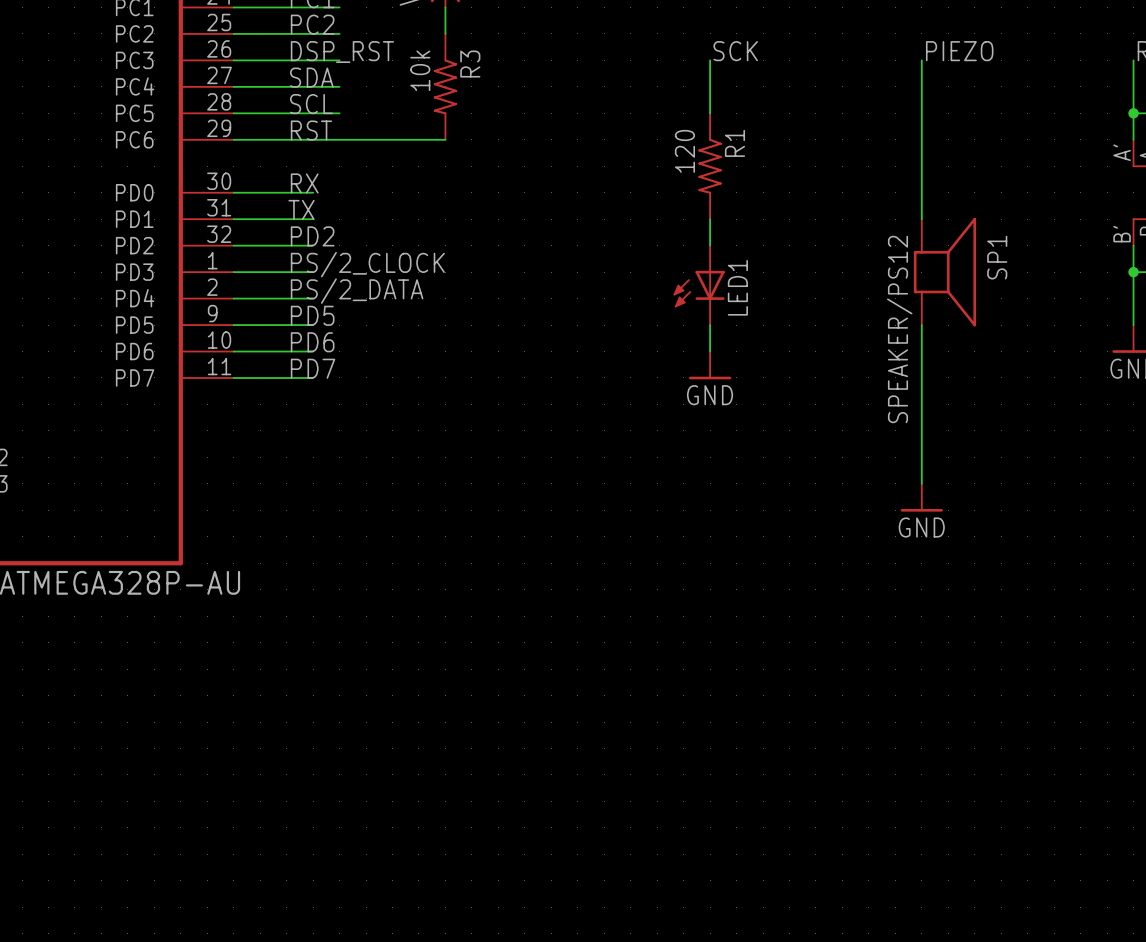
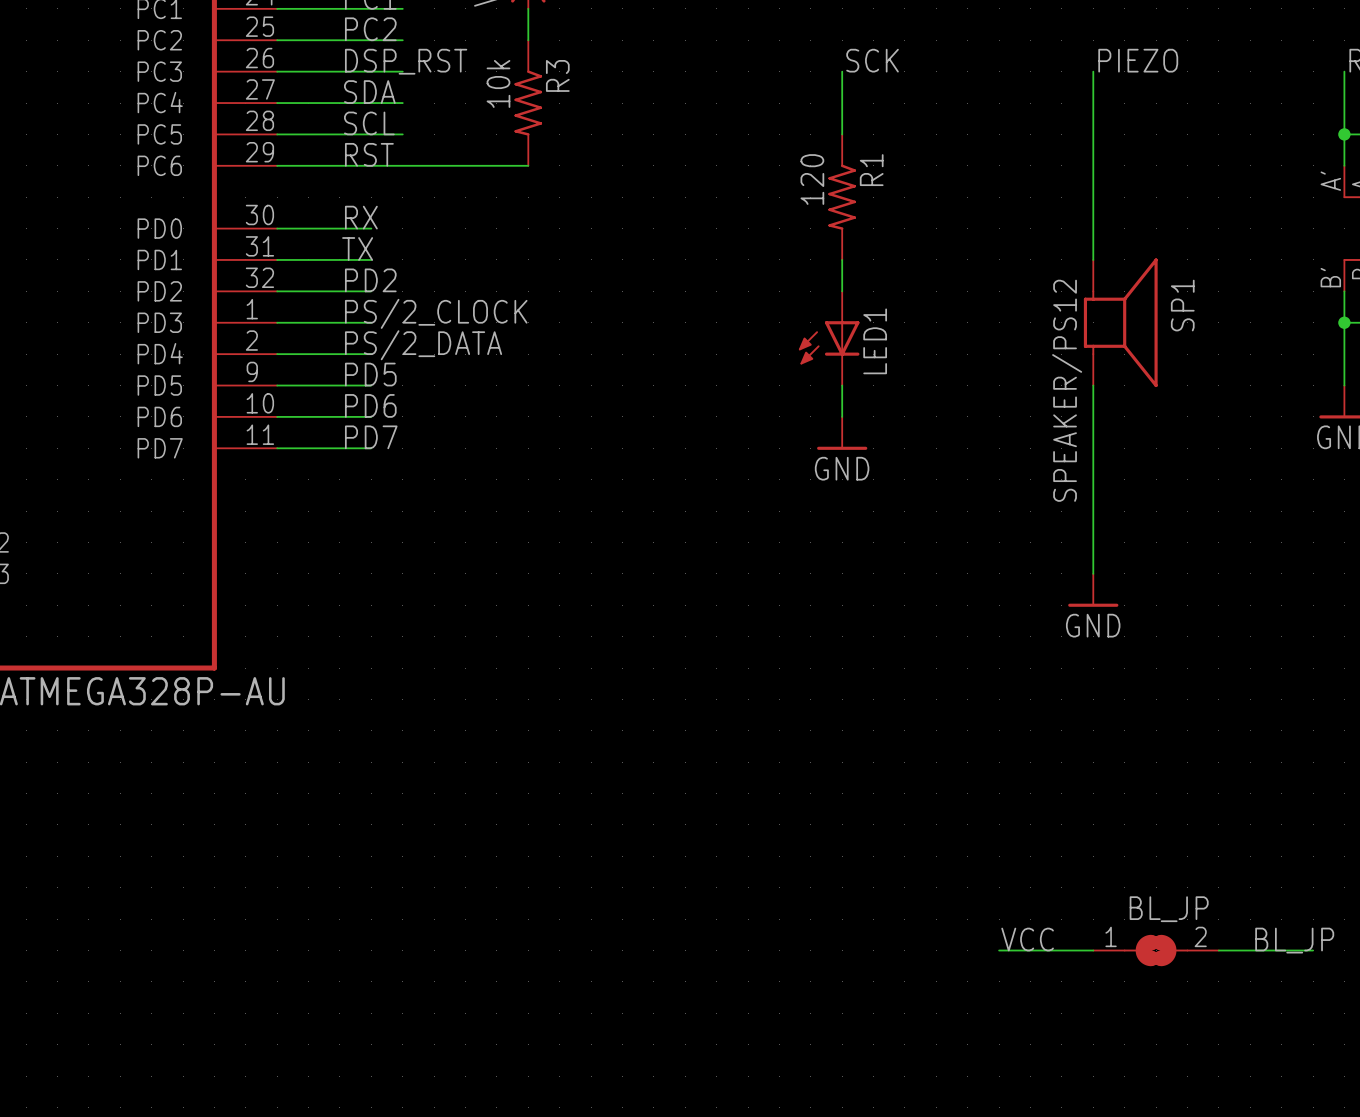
label: none -> VCC (1027, 939)
label: none -> BL_JP (1294, 940)
wire: none -> (999, 950) (1093, 950)
BL_JP: none -> (1156, 950)
wire: none -> (1218, 950) (1313, 950)

